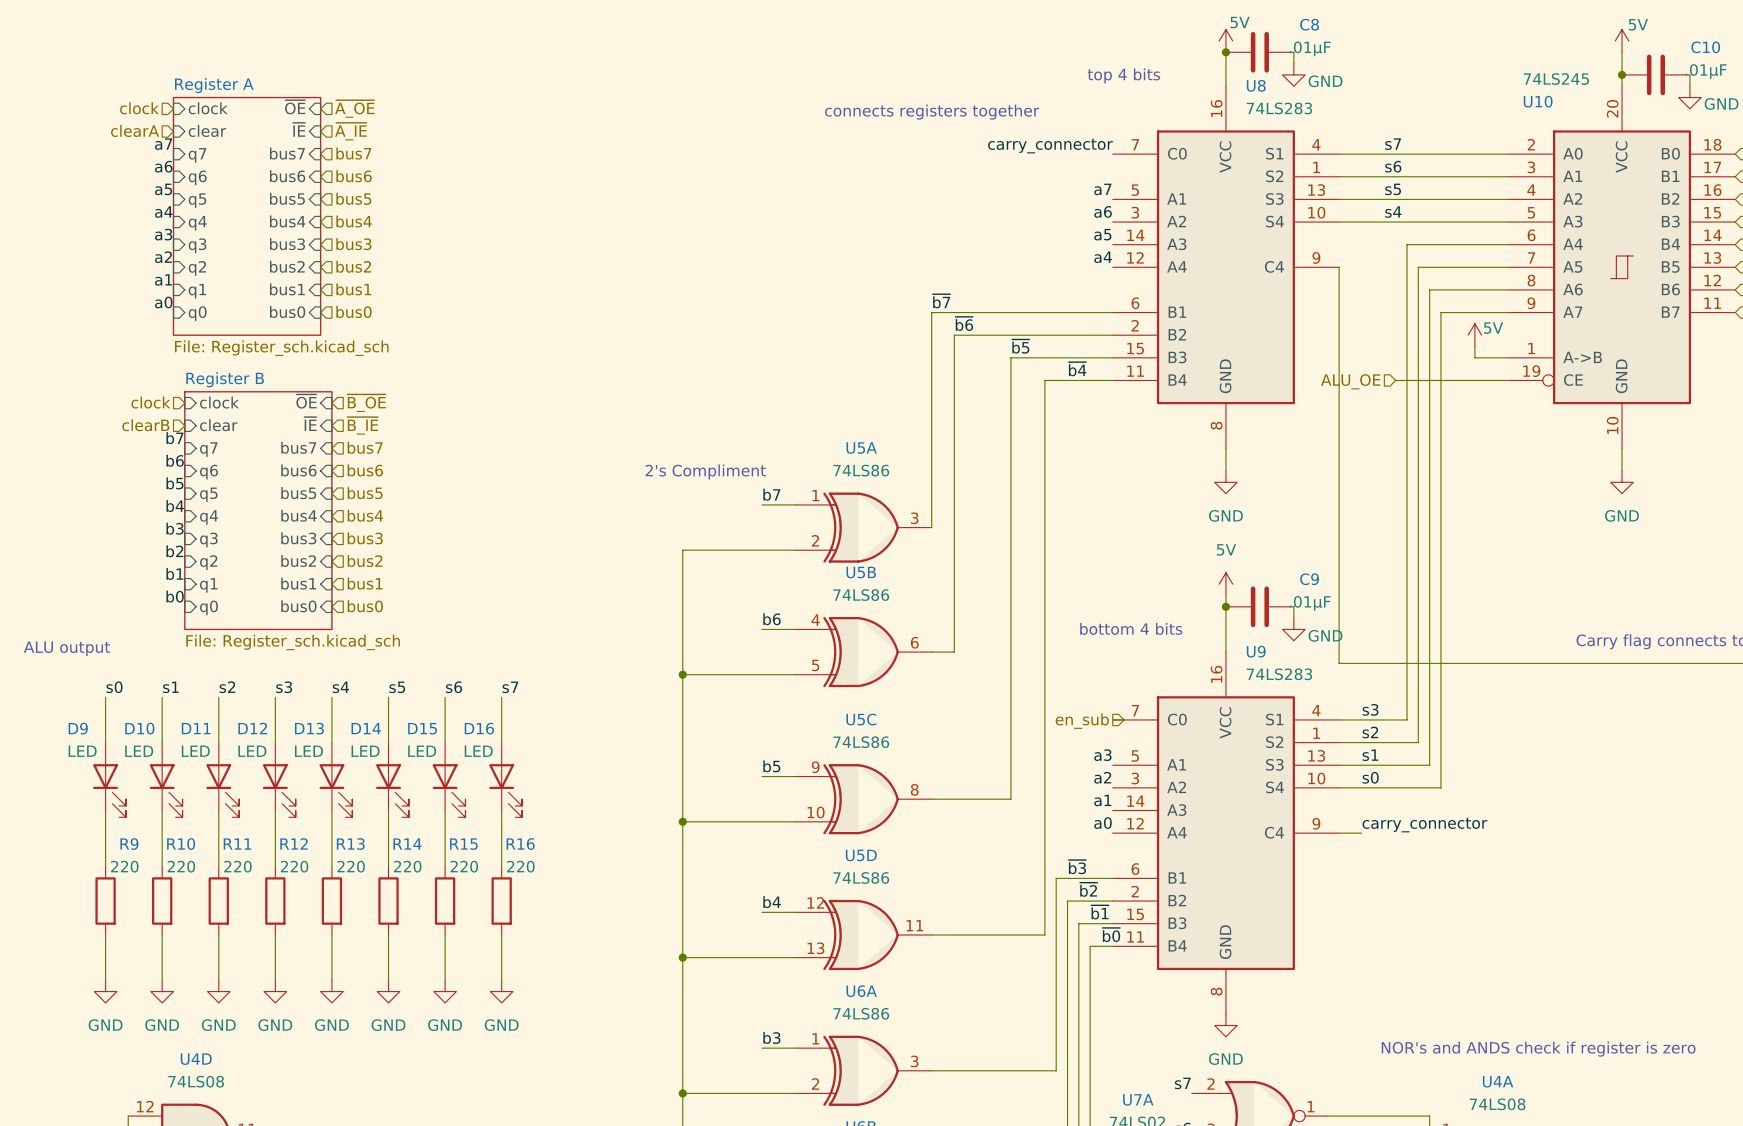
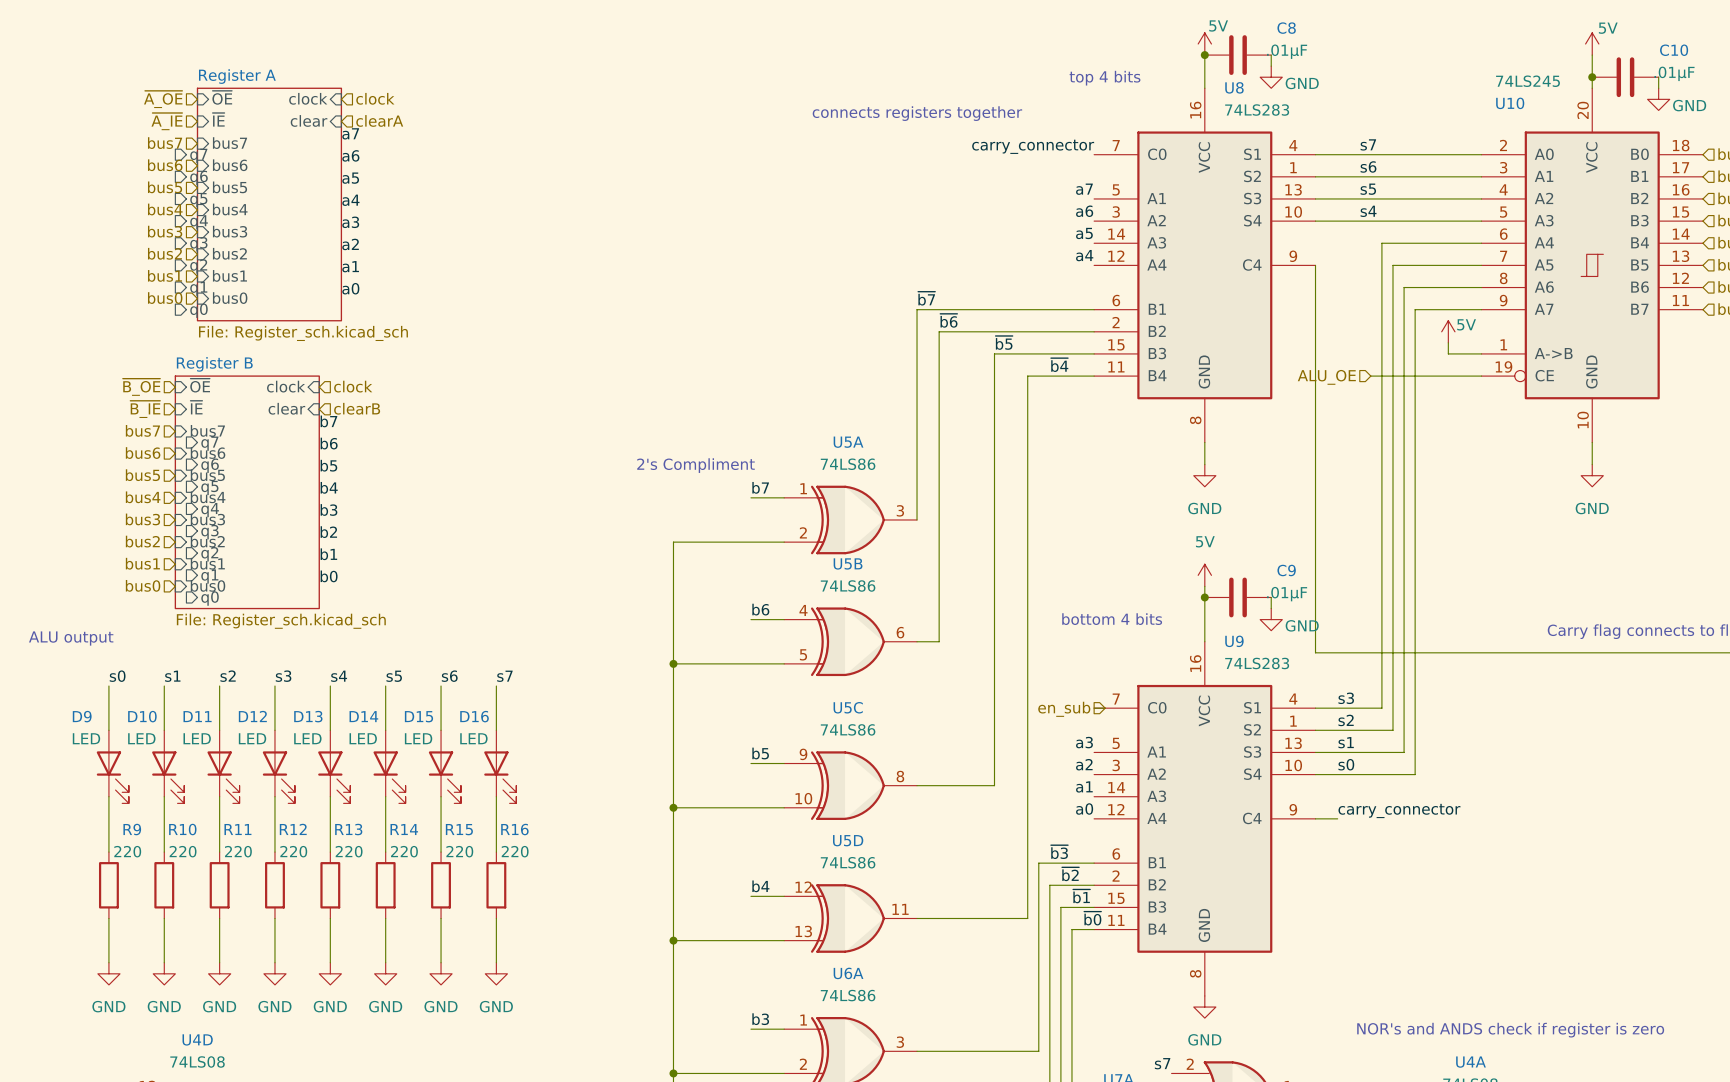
hierarchical label: none -> clock (375, 98)
sheet pin rotation: 0° (295, 107) -> 180° (222, 97)
hierarchical label: clock (139, 108) -> none
sheet pin rotation: 0° (208, 108) -> 180° (308, 98)
sheet pin position: clock (208, 108) -> clock (308, 98)
hierarchical label rotation: 0° (354, 108) -> 180° (163, 99)
hierarchical label position: ~{A_OE} (354, 108) -> ~{A_OE} (163, 99)
sheet pin rotation: 0° (299, 129) -> 180° (218, 119)
hierarchical label rotation: 0° (135, 130) -> 180° (379, 120)
hierarchical label position: clearA (135, 130) -> clearA (379, 120)
sheet pin rotation: 0° (207, 130) -> 180° (309, 120)
sheet pin position: clear (207, 130) -> clear (309, 120)
hierarchical label rotation: 0° (350, 131) -> 180° (166, 121)
hierarchical label position: ~{A_IE} (350, 131) -> ~{A_IE} (166, 121)
label position: a7 (163, 144) -> a7 (350, 133)
sheet pin rotation: 0° (287, 153) -> 180° (230, 143)
hierarchical label rotation: 0° (353, 153) -> 180° (165, 143)
hierarchical label position: bus7 (353, 153) -> bus7 (165, 143)
label position: a6 (163, 166) -> a6 (350, 155)
sheet pin rotation: 0° (287, 176) -> 180° (230, 165)
hierarchical label rotation: 0° (354, 176) -> 180° (165, 165)
hierarchical label position: bus6 (354, 176) -> bus6 (165, 165)
label position: a5 (163, 189) -> a5 (350, 178)
sheet pin rotation: 0° (287, 198) -> 180° (230, 187)
hierarchical label rotation: 0° (353, 198) -> 180° (165, 187)
hierarchical label position: bus5 (353, 198) -> bus5 (165, 187)
label position: a4 (163, 212) -> a4 (350, 200)
sheet Register A position: (247, 216) -> (269, 204)
sheet pin rotation: 0° (287, 221) -> 180° (230, 209)
hierarchical label rotation: 0° (354, 221) -> 180° (165, 209)
hierarchical label position: bus4 (354, 221) -> bus4 (165, 209)
label position: a3 (163, 234) -> a3 (350, 222)
sheet pin rotation: 0° (287, 244) -> 180° (230, 231)
hierarchical label rotation: 0° (353, 244) -> 180° (165, 231)
hierarchical label position: bus3 (353, 244) -> bus3 (165, 231)
label position: a2 (163, 257) -> a2 (350, 244)
sheet pin rotation: 0° (287, 266) -> 180° (229, 253)
hierarchical label rotation: 0° (353, 266) -> 180° (164, 253)
hierarchical label position: bus2 (353, 266) -> bus2 (164, 253)
label position: a1 (163, 279) -> a1 (350, 266)
sheet pin rotation: 0° (287, 289) -> 180° (229, 275)
hierarchical label rotation: 0° (353, 289) -> 180° (165, 275)
hierarchical label position: bus1 (353, 289) -> bus1 (165, 275)
label position: a0 (163, 302) -> a0 (350, 288)
sheet pin rotation: 0° (287, 312) -> 180° (230, 298)
hierarchical label rotation: 0° (354, 312) -> 180° (165, 298)
hierarchical label position: bus0 (354, 312) -> bus0 (165, 298)
sheet pin rotation: 0° (306, 401) -> 180° (200, 385)
sheet pin position: ~{OE} (306, 401) -> ~{OE} (200, 385)
hierarchical label rotation: 0° (150, 402) -> 180° (353, 386)
hierarchical label position: clock (150, 402) -> clock (353, 386)
sheet pin rotation: 0° (219, 402) -> 180° (286, 386)
hierarchical label rotation: 0° (366, 403) -> 180° (141, 387)
hierarchical label position: ~{B_OE} (366, 403) -> ~{B_OE} (141, 387)
sheet pin rotation: 0° (310, 424) -> 180° (196, 407)
sheet pin position: ~{IE} (310, 424) -> ~{IE} (196, 407)
hierarchical label rotation: 0° (145, 425) -> 180° (357, 408)
hierarchical label position: clearB (145, 425) -> clearB (357, 408)
sheet pin rotation: 0° (218, 425) -> 180° (286, 408)
hierarchical label rotation: 0° (362, 425) -> 180° (145, 409)
hierarchical label position: ~{B_IE} (362, 425) -> ~{B_IE} (145, 409)
hierarchical label: none -> bus7 (142, 430)
label position: b7 (174, 438) -> b7 (328, 421)
sheet pin rotation: 0° (298, 447) -> 180° (207, 430)
sheet pin position: bus7 (298, 447) -> bus7 (207, 430)
hierarchical label: bus7 (365, 447) -> none
hierarchical label: none -> bus6 (143, 453)
label position: b6 (175, 460) -> b6 (329, 443)
sheet pin rotation: 0° (298, 470) -> 180° (208, 453)
sheet pin position: bus6 (298, 470) -> bus6 (208, 453)
hierarchical label: bus6 (365, 470) -> none
hierarchical label: none -> bus5 (142, 475)
label position: b5 (174, 483) -> b5 (328, 465)
sheet pin rotation: 0° (298, 493) -> 180° (207, 475)
sheet pin position: bus5 (298, 493) -> bus5 (207, 475)
hierarchical label: bus5 (365, 493) -> none
hierarchical label: none -> bus4 (143, 497)
label position: b4 (175, 506) -> b4 (329, 487)
sheet Register B position: (258, 510) -> (247, 492)
sheet pin rotation: 0° (299, 515) -> 180° (208, 497)
sheet pin position: bus4 (299, 515) -> bus4 (208, 497)
hierarchical label: bus4 (365, 515) -> none
hierarchical label: none -> bus3 (142, 519)
label position: b3 (175, 528) -> b3 (328, 509)
sheet pin rotation: 0° (298, 538) -> 180° (207, 519)
sheet pin position: bus3 (298, 538) -> bus3 (207, 519)
hierarchical label: bus3 (365, 538) -> none
hierarchical label: none -> bus2 (142, 541)
label position: b2 (174, 551) -> b2 (328, 532)
sheet pin rotation: 0° (298, 560) -> 180° (207, 541)
sheet pin position: bus2 (298, 560) -> bus2 (207, 541)
hierarchical label: bus2 (365, 560) -> none
hierarchical label: none -> bus1 (142, 563)
label position: b1 (174, 573) -> b1 (328, 554)
sheet pin rotation: 0° (298, 583) -> 180° (207, 563)
sheet pin position: bus1 (298, 583) -> bus1 (207, 563)
hierarchical label: bus1 (365, 583) -> none
hierarchical label: none -> bus0 (143, 585)
label position: b0 (175, 596) -> b0 (329, 576)
sheet pin rotation: 0° (298, 606) -> 180° (208, 585)
sheet pin position: bus0 (298, 606) -> bus0 (208, 585)
hierarchical label: bus0 (365, 606) -> none

